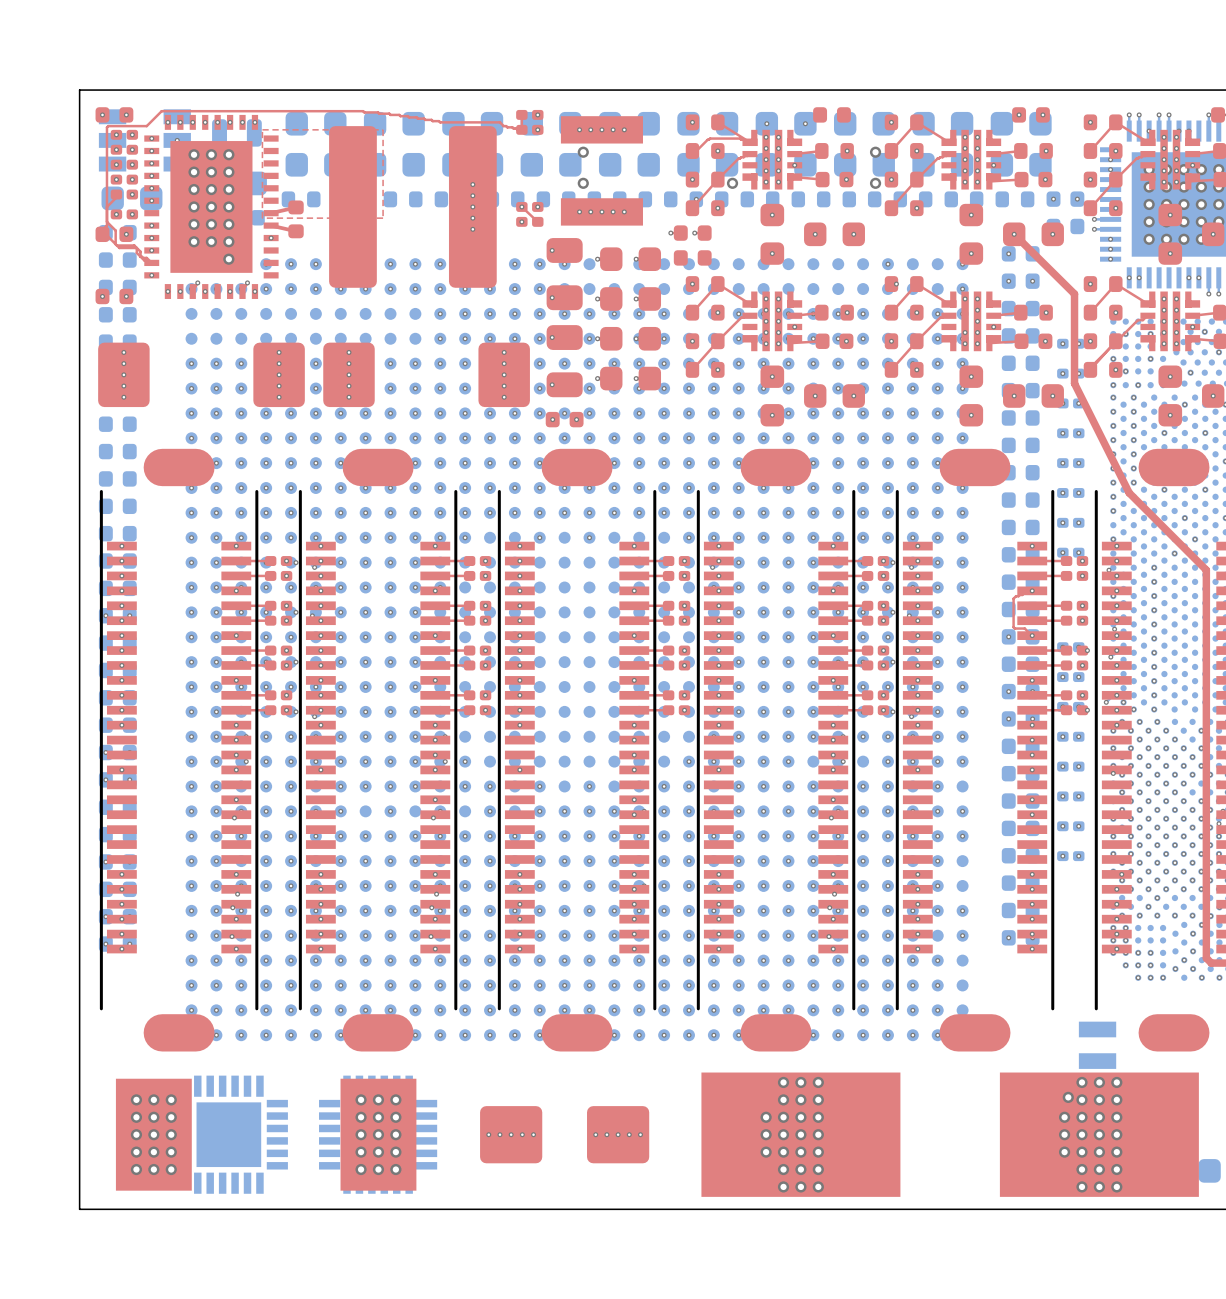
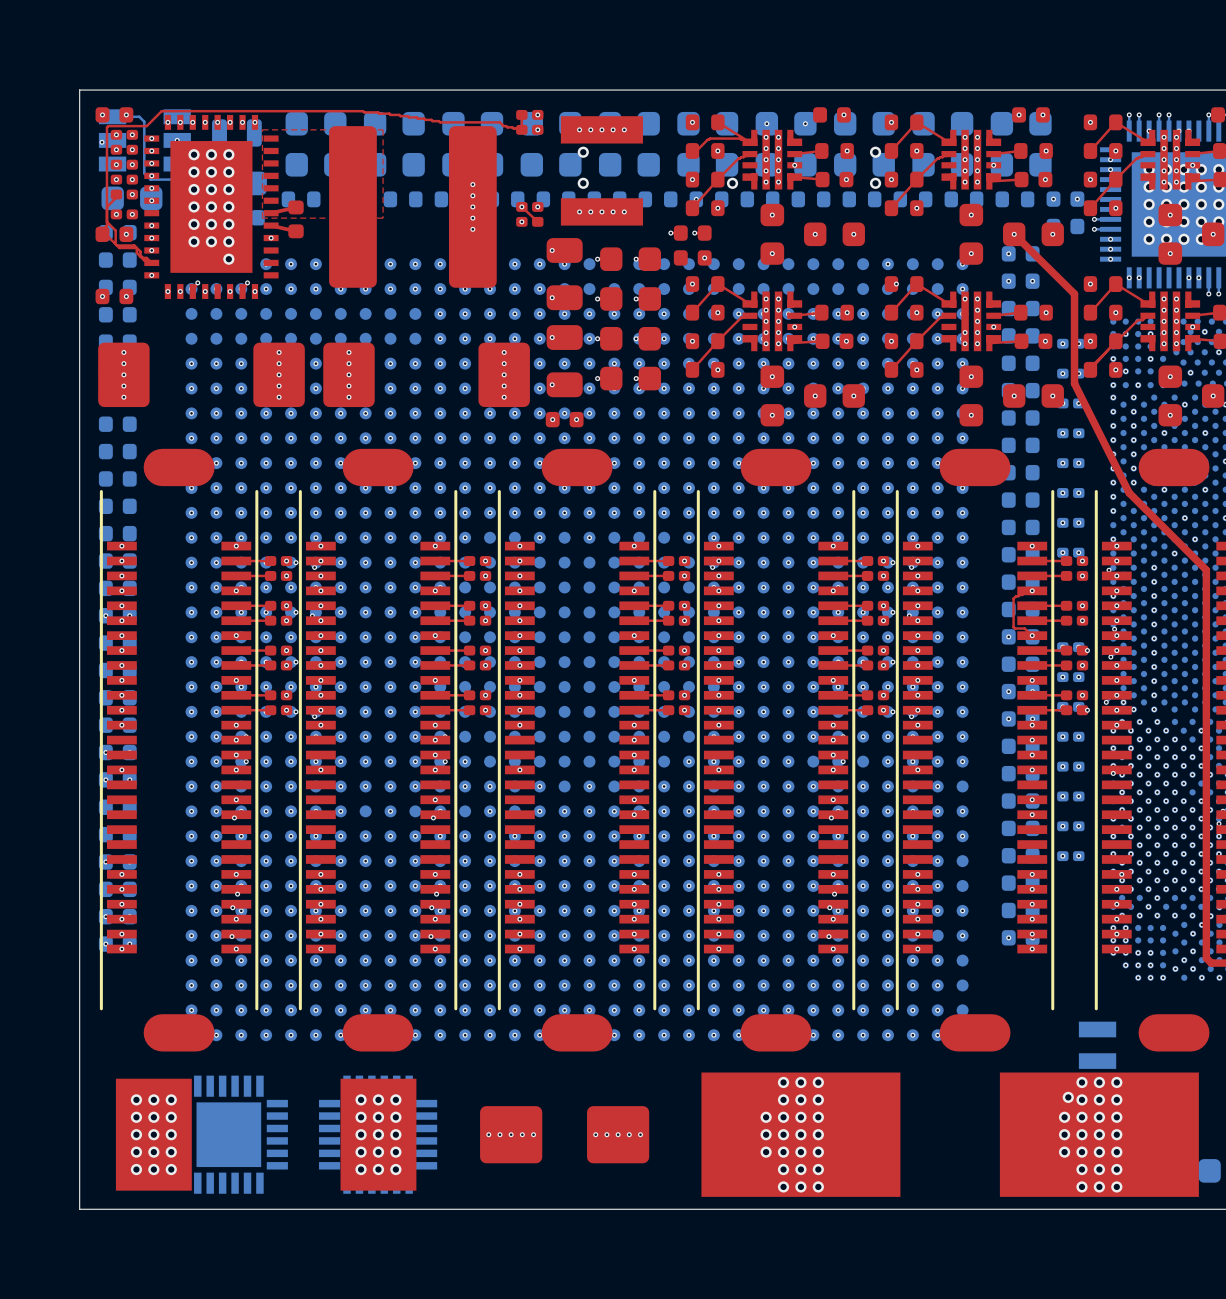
via: none -> (843, 114)
bottom track: none -> (112, 116) (139, 116) (144, 121) (144, 173) (150, 179) (177, 179) (177, 182)
via: none -> (102, 142)
via: none -> (704, 257)

